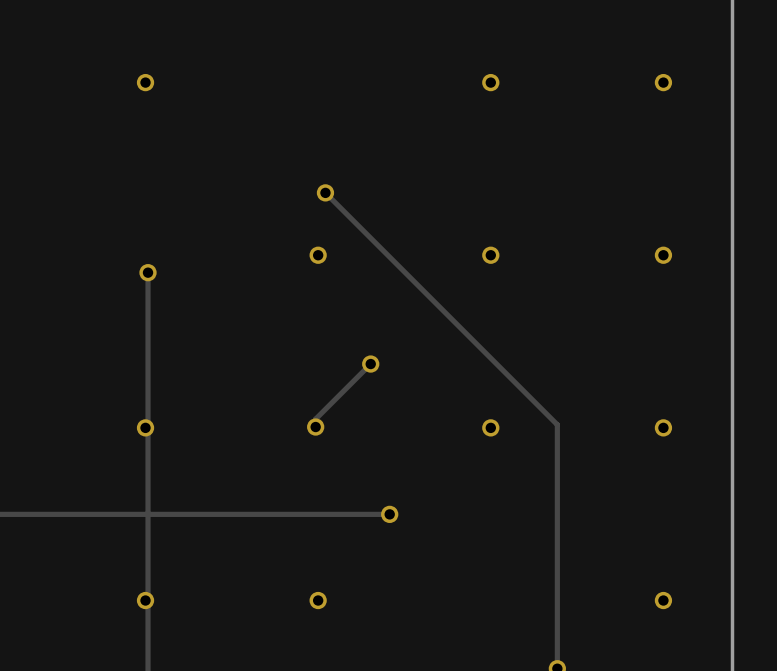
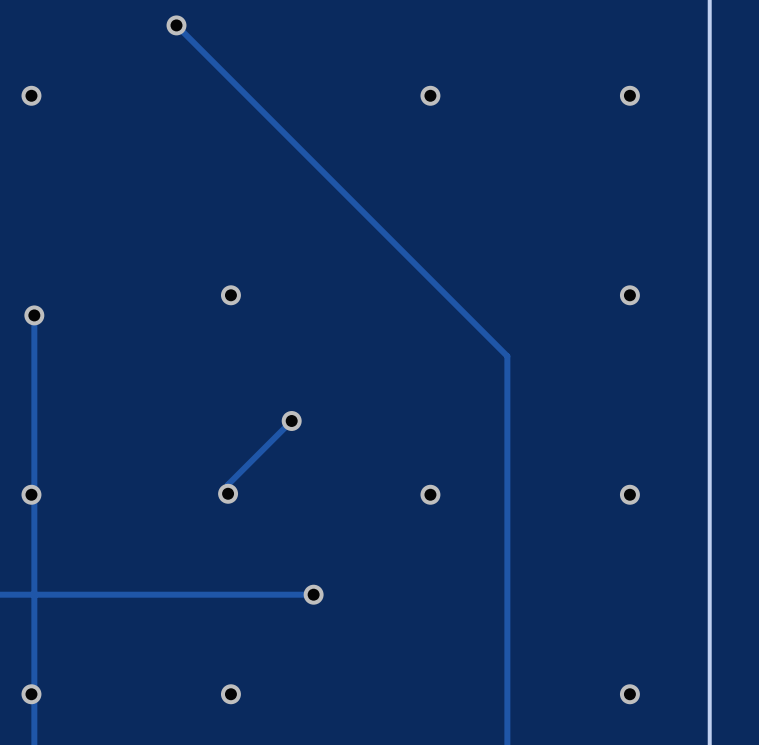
via: none -> (176, 25)
track: (325, 192) (557, 424) -> (176, 25) (507, 356) (507, 491)
via: (325, 192) -> none
via: (490, 255) -> none

